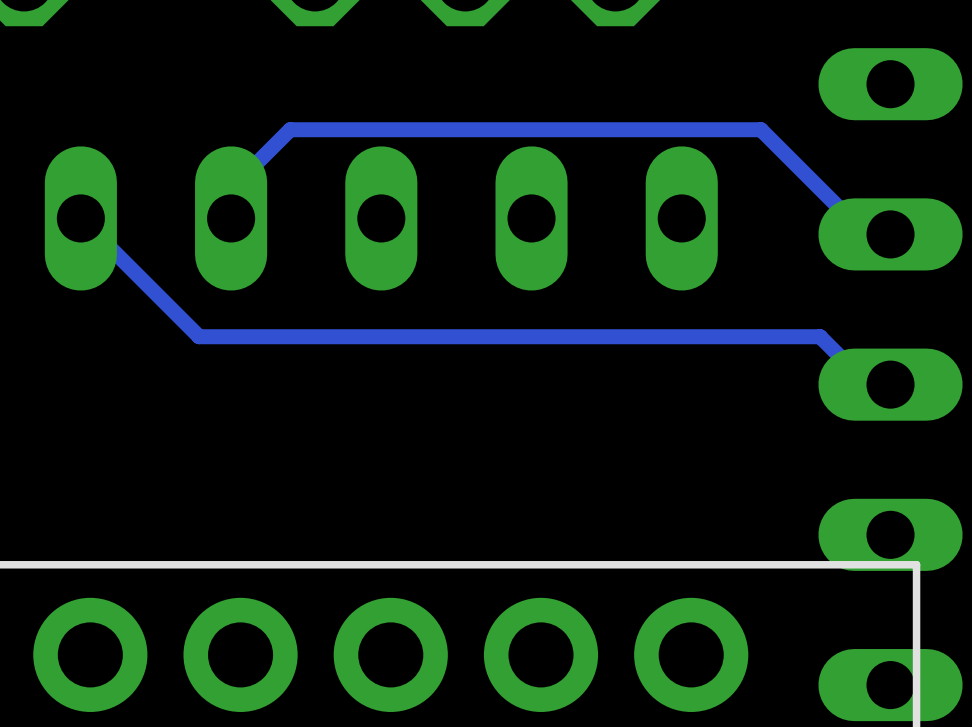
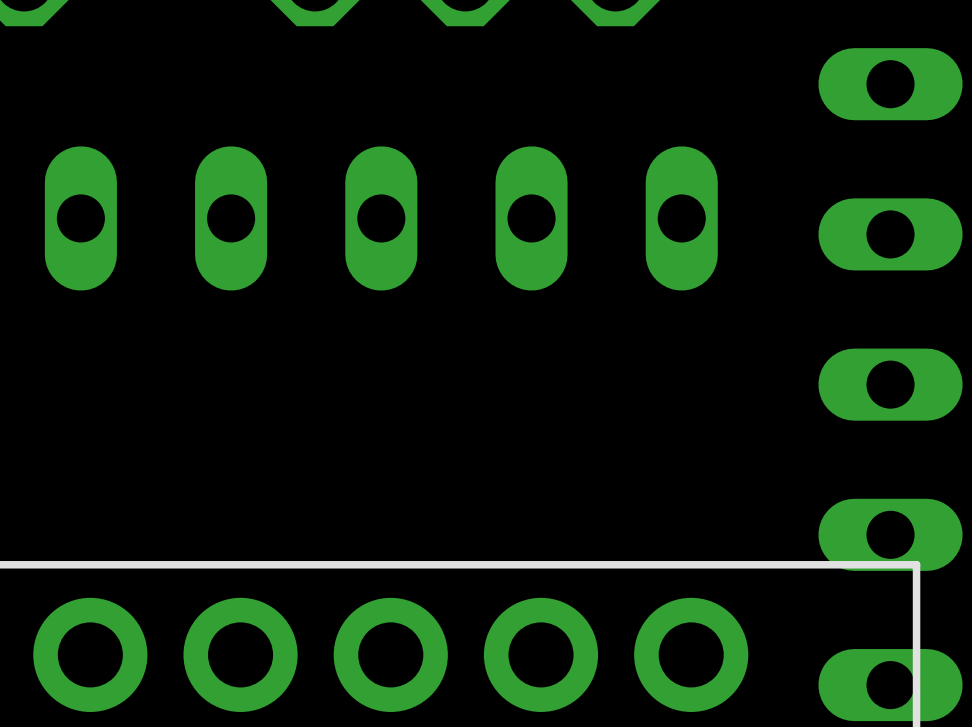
track: (80, 218) (199, 336) (820, 336) (868, 384) (890, 384) -> none
track: (231, 218) (231, 188) (290, 129) (761, 129) (865, 234) (890, 234) -> none

